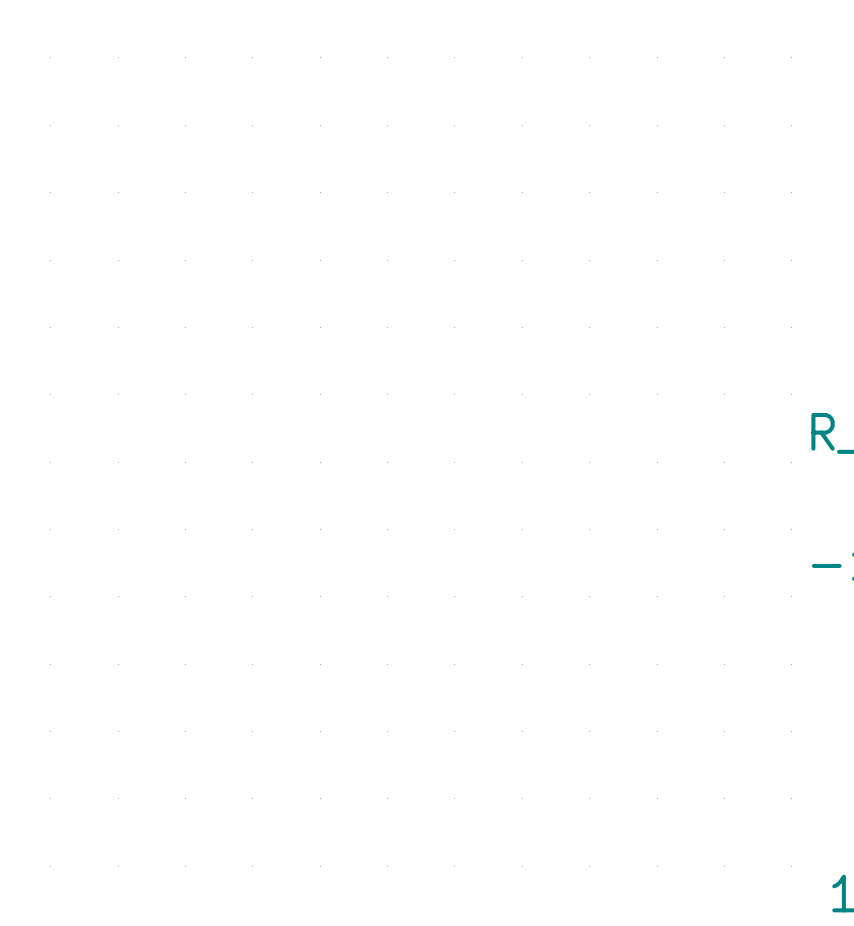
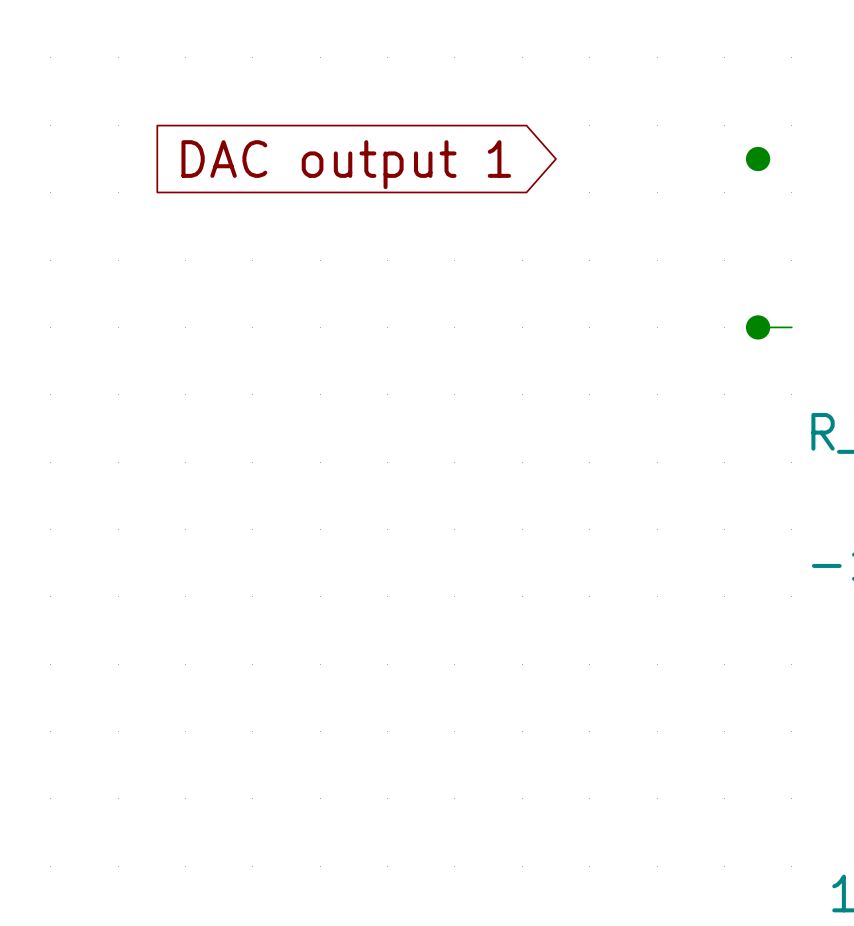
junction: none -> (758, 159)
global label: none -> DAC output 1 (346, 164)
wire: none -> (758, 327) (791, 327)
junction: none -> (758, 327)

